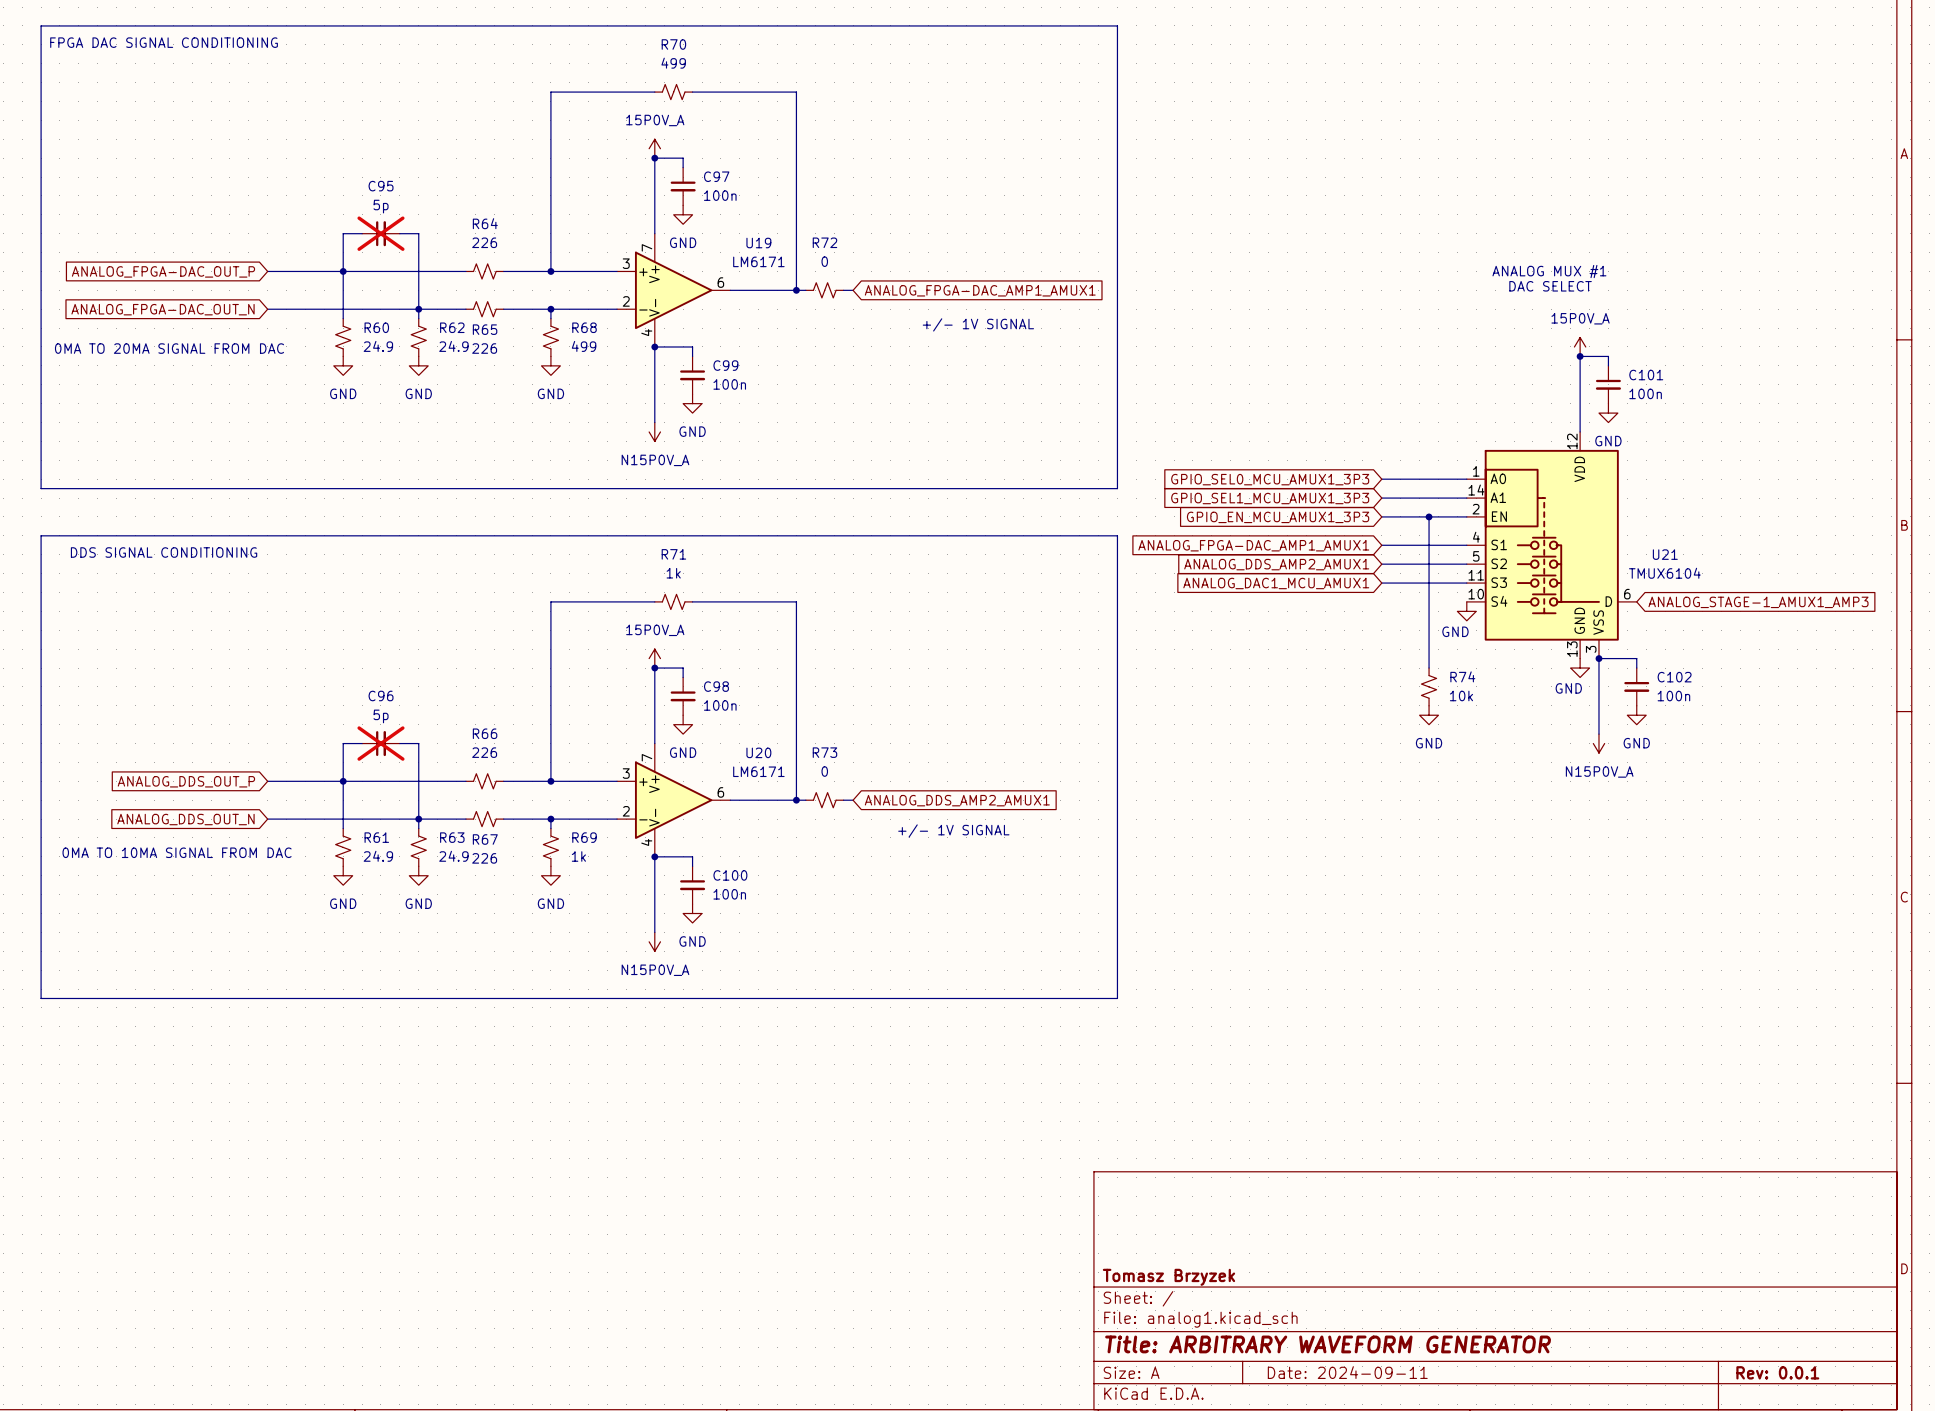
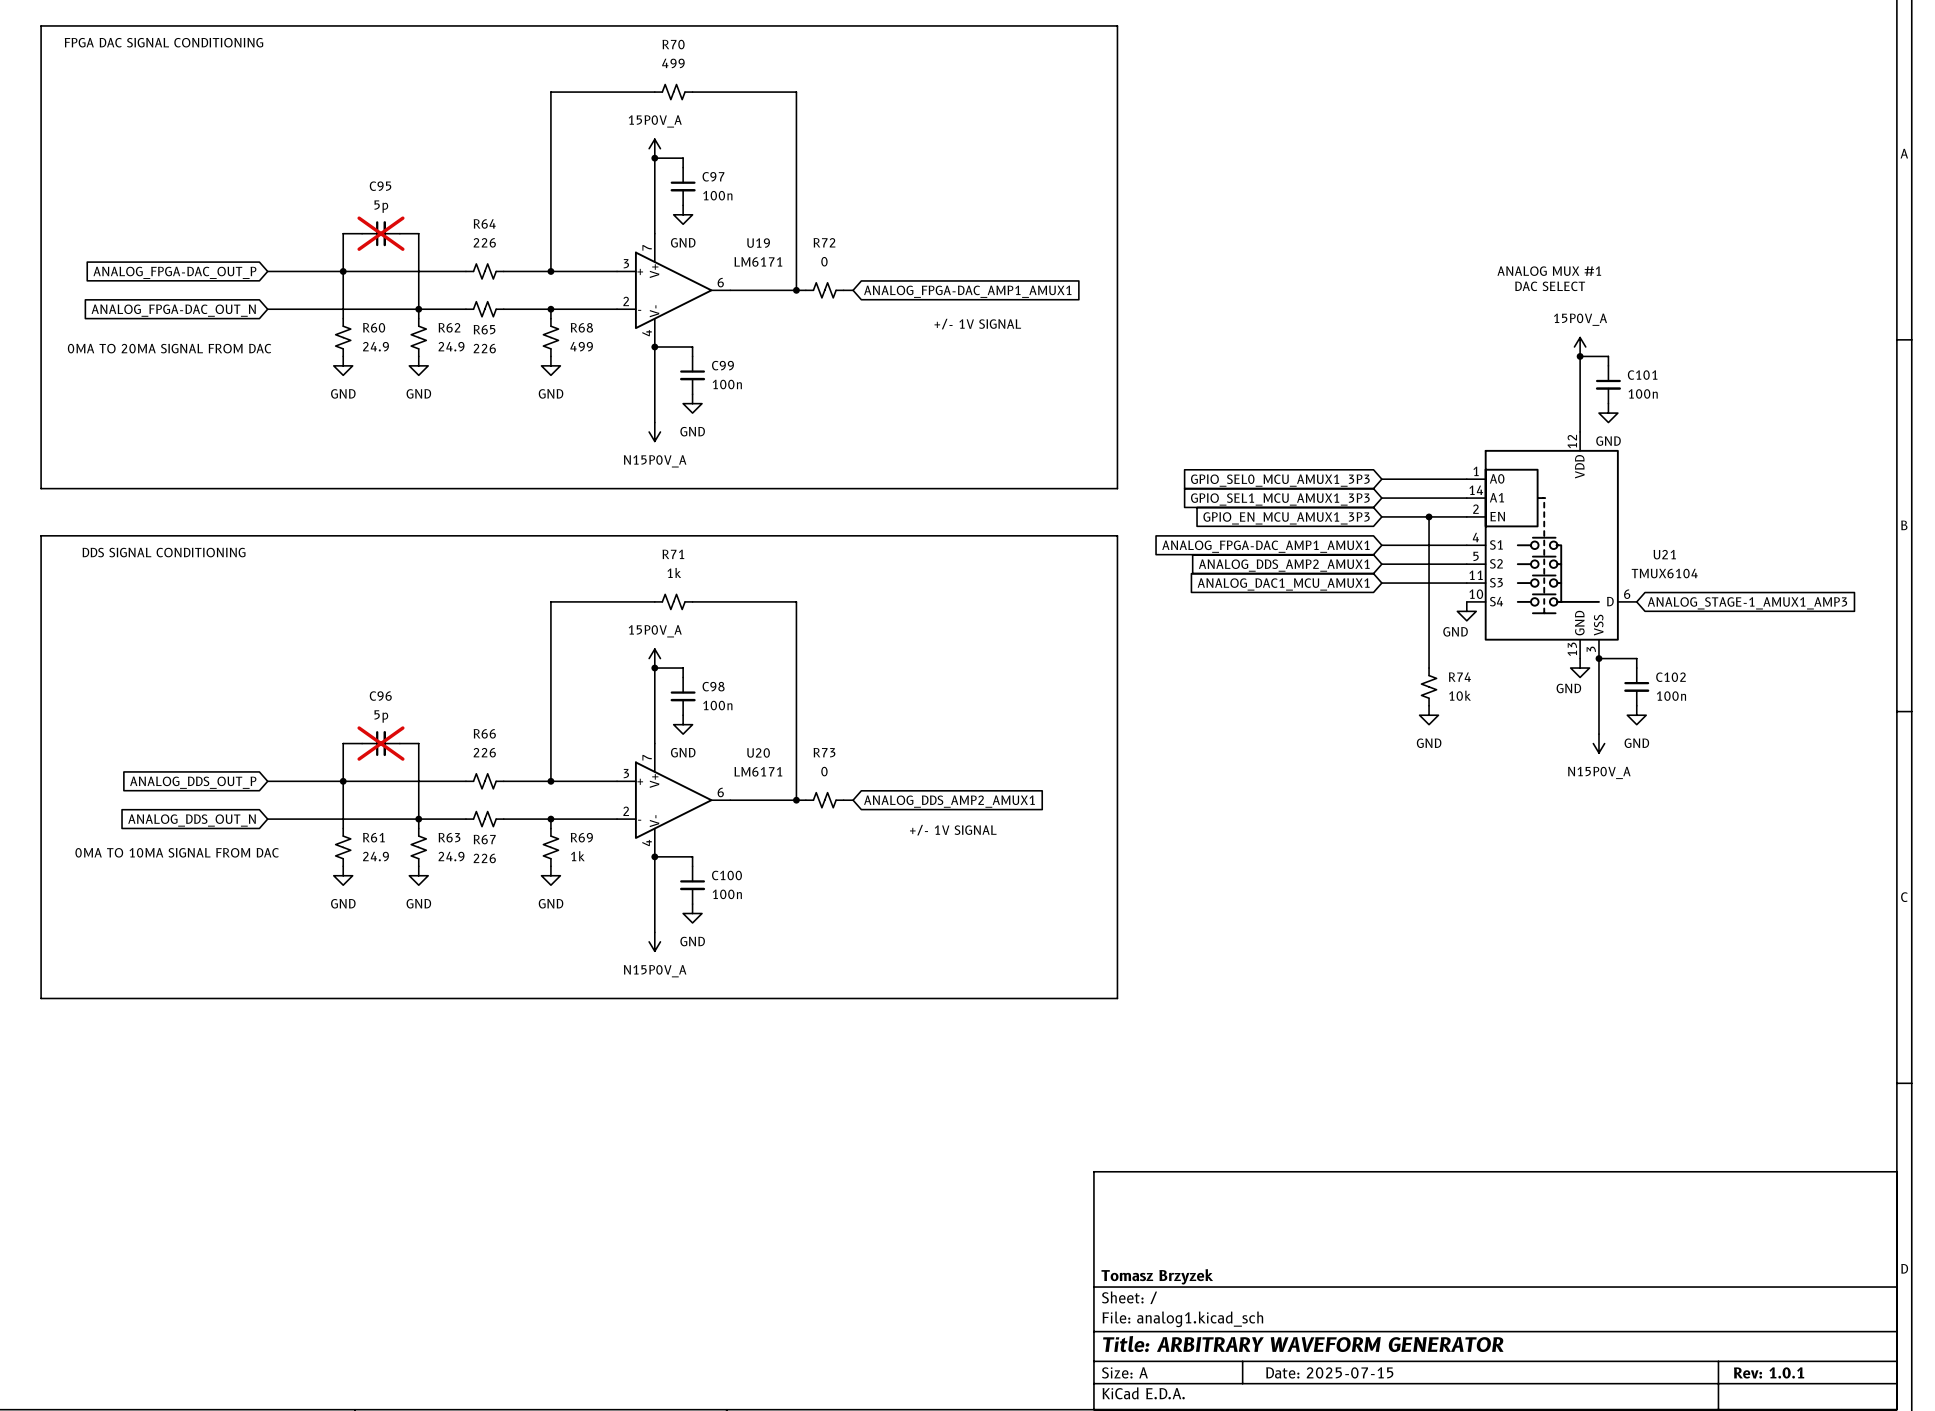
title block: Date: 2024-09-11 (1347, 1372) -> Date: 2025-07-15 (1329, 1372)
title block: Rev: 0.0.1 (1777, 1372) -> Rev: 1.0.1 (1769, 1372)

